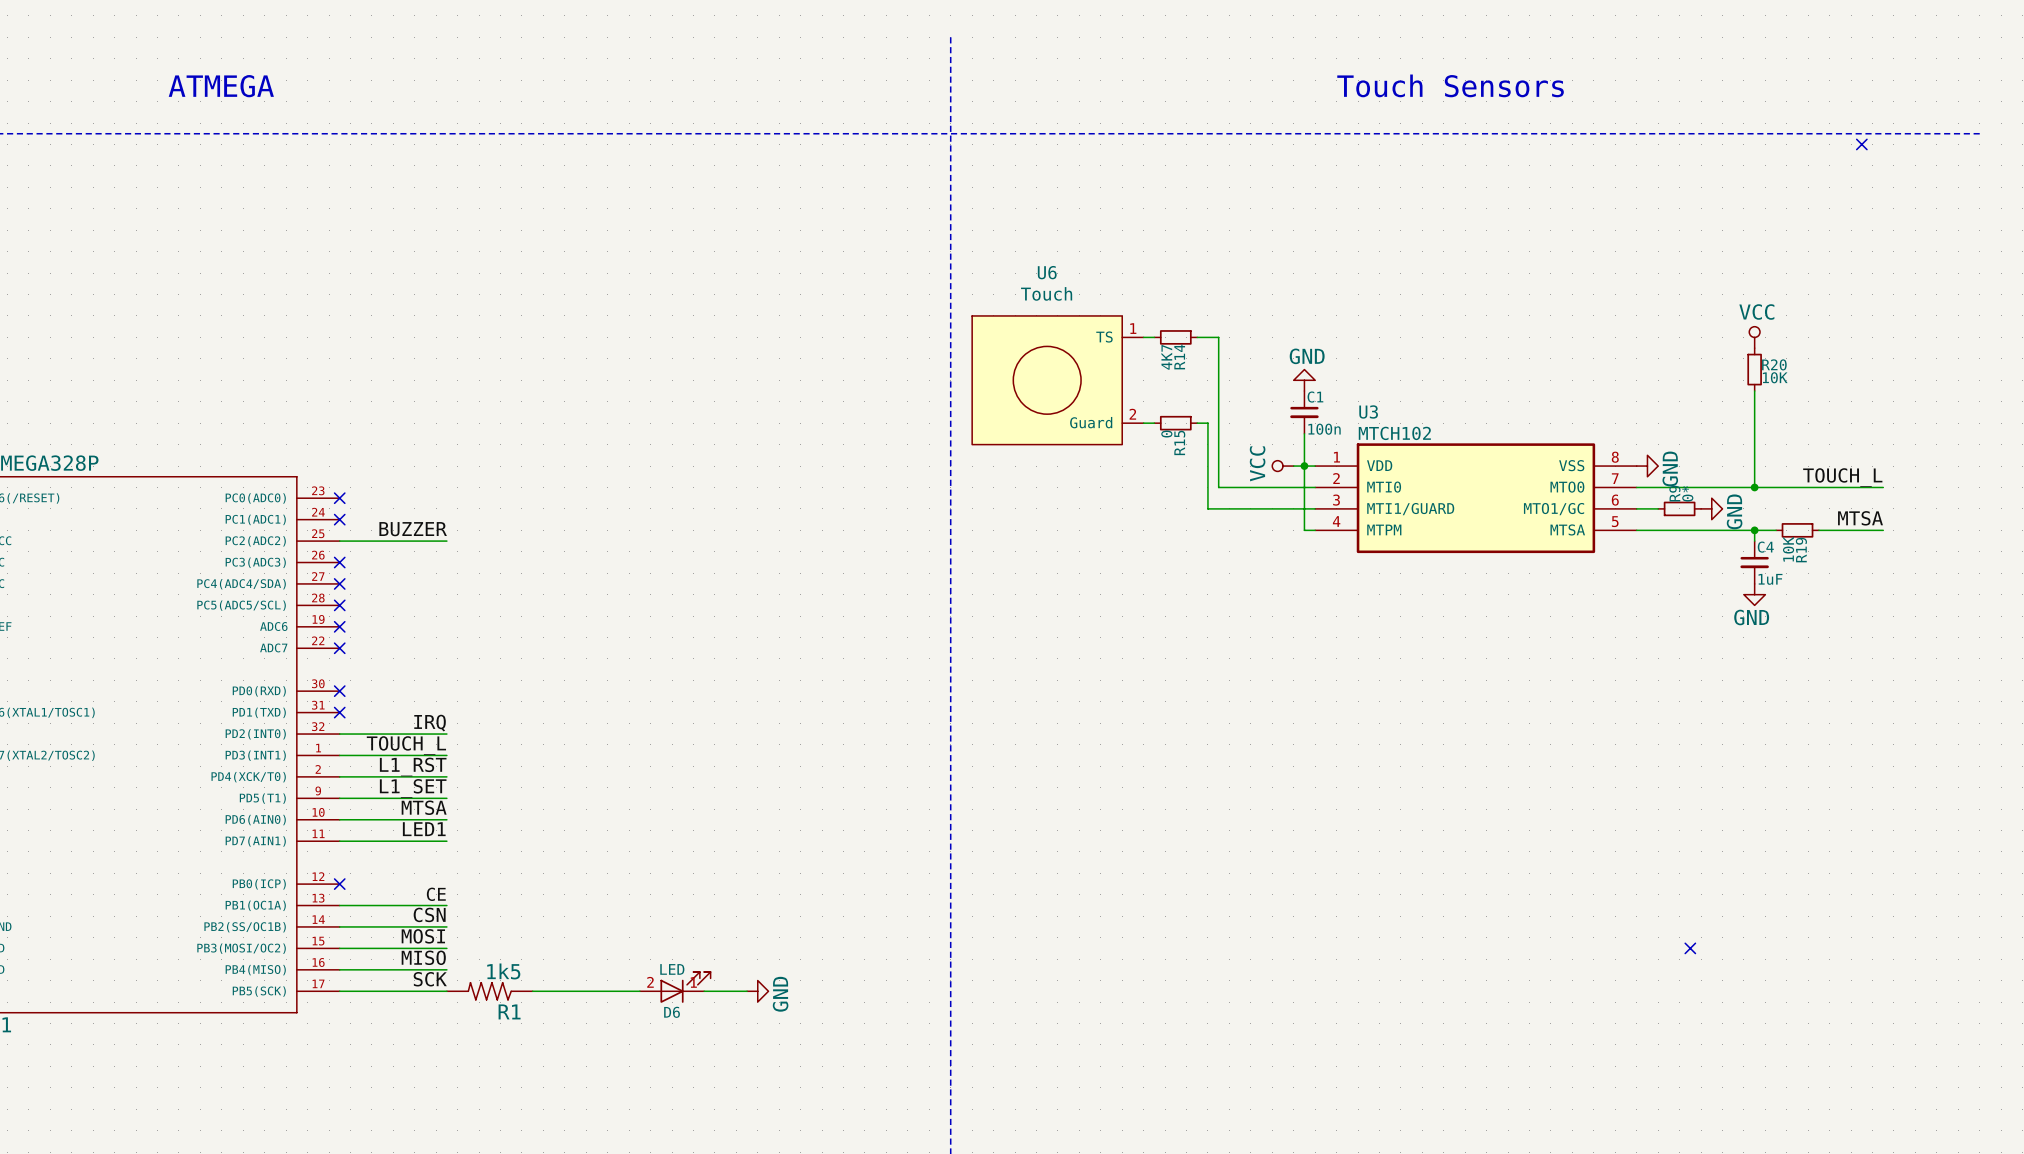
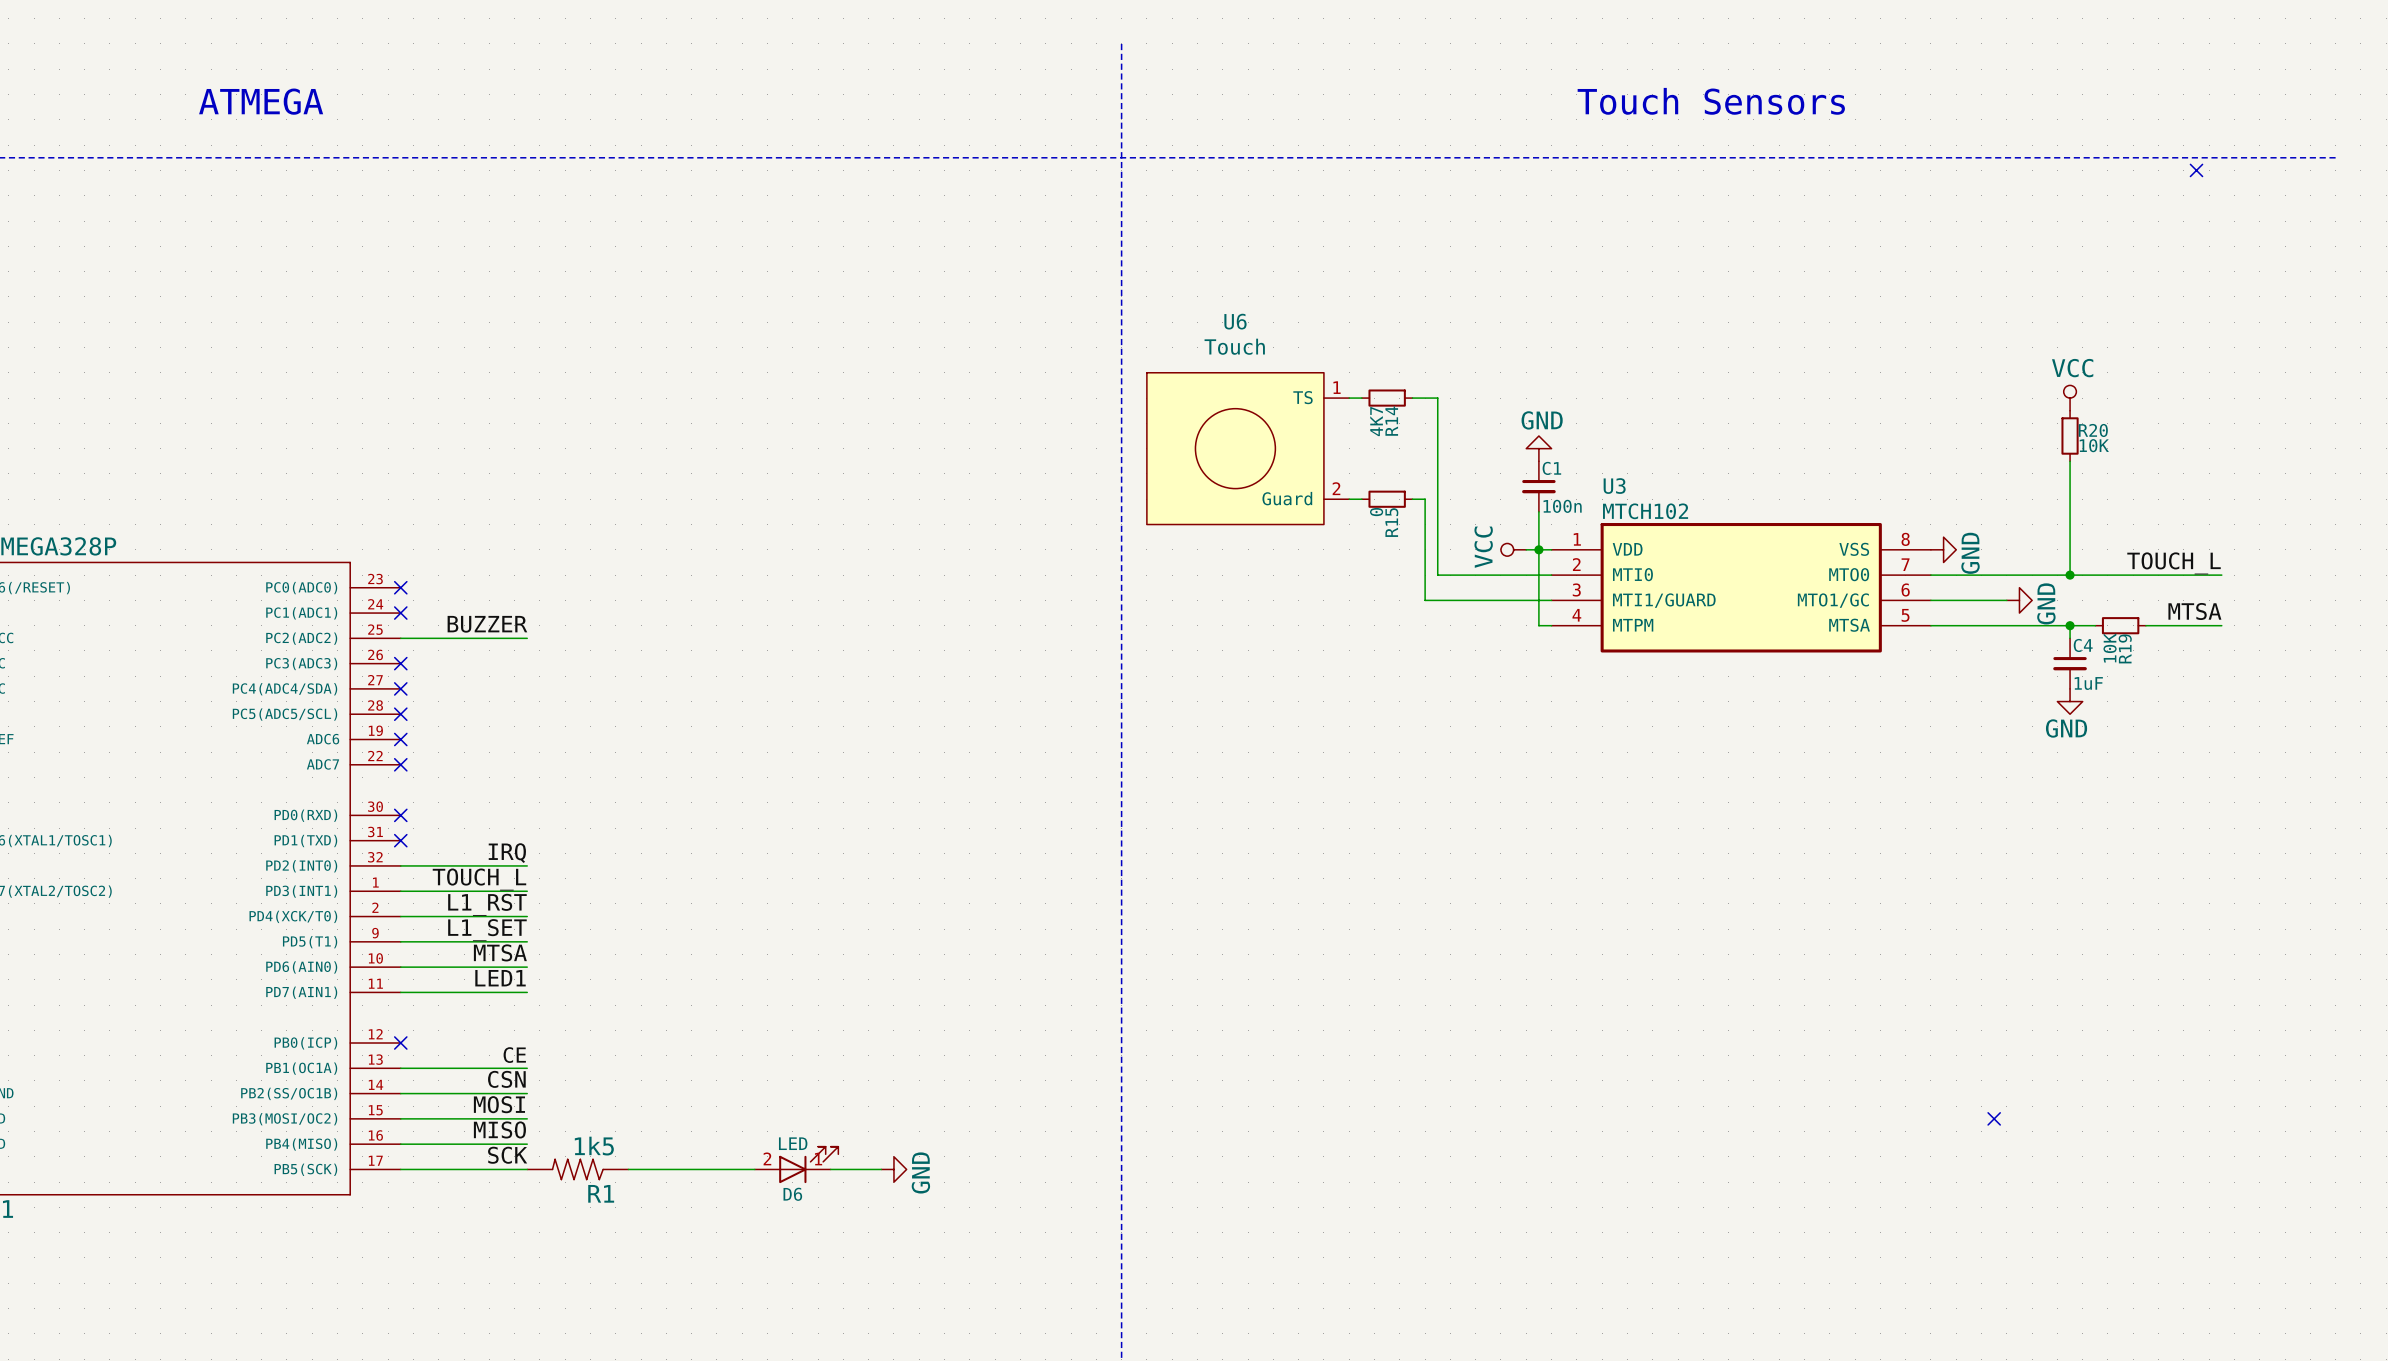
wire: none -> (1956, 600) (2006, 600)
R9: 0* (1679, 508) -> none

